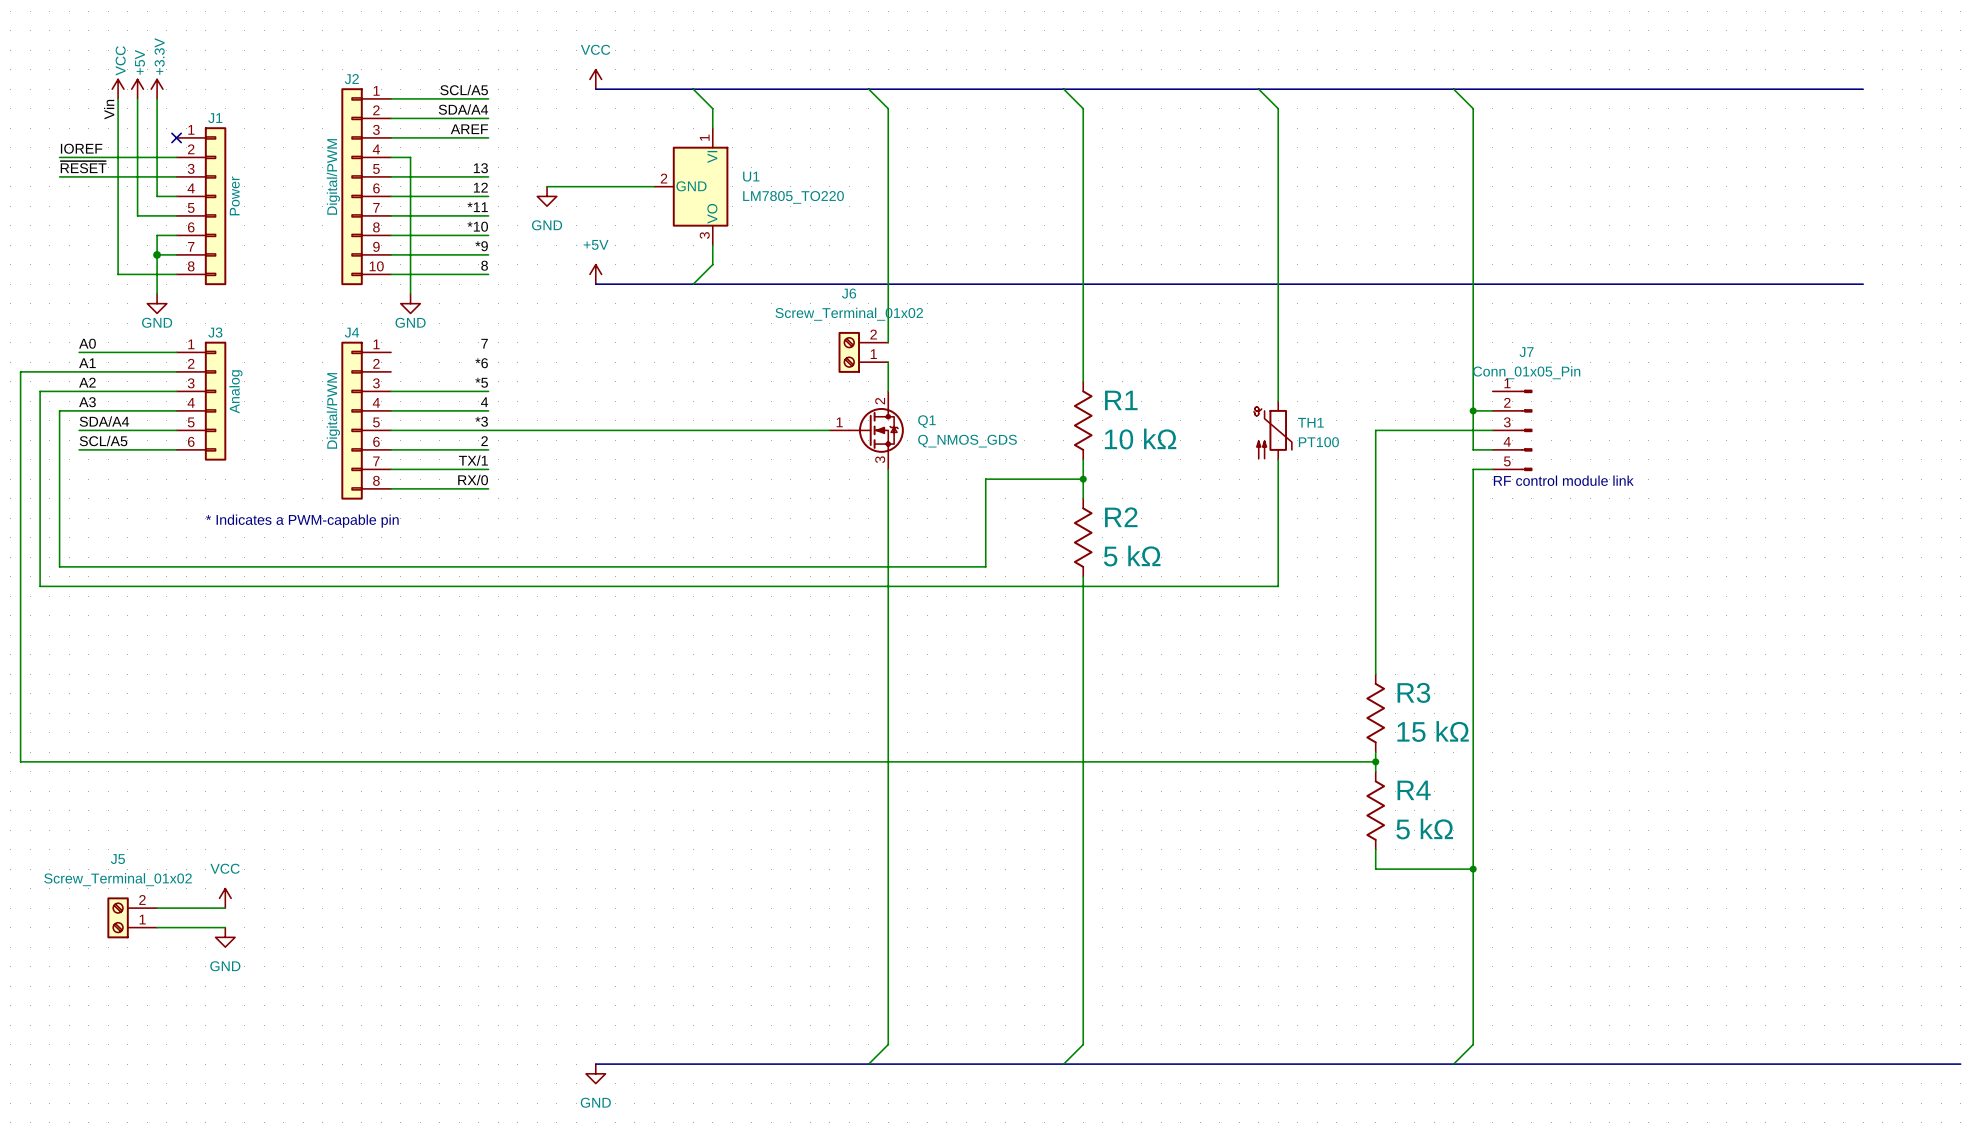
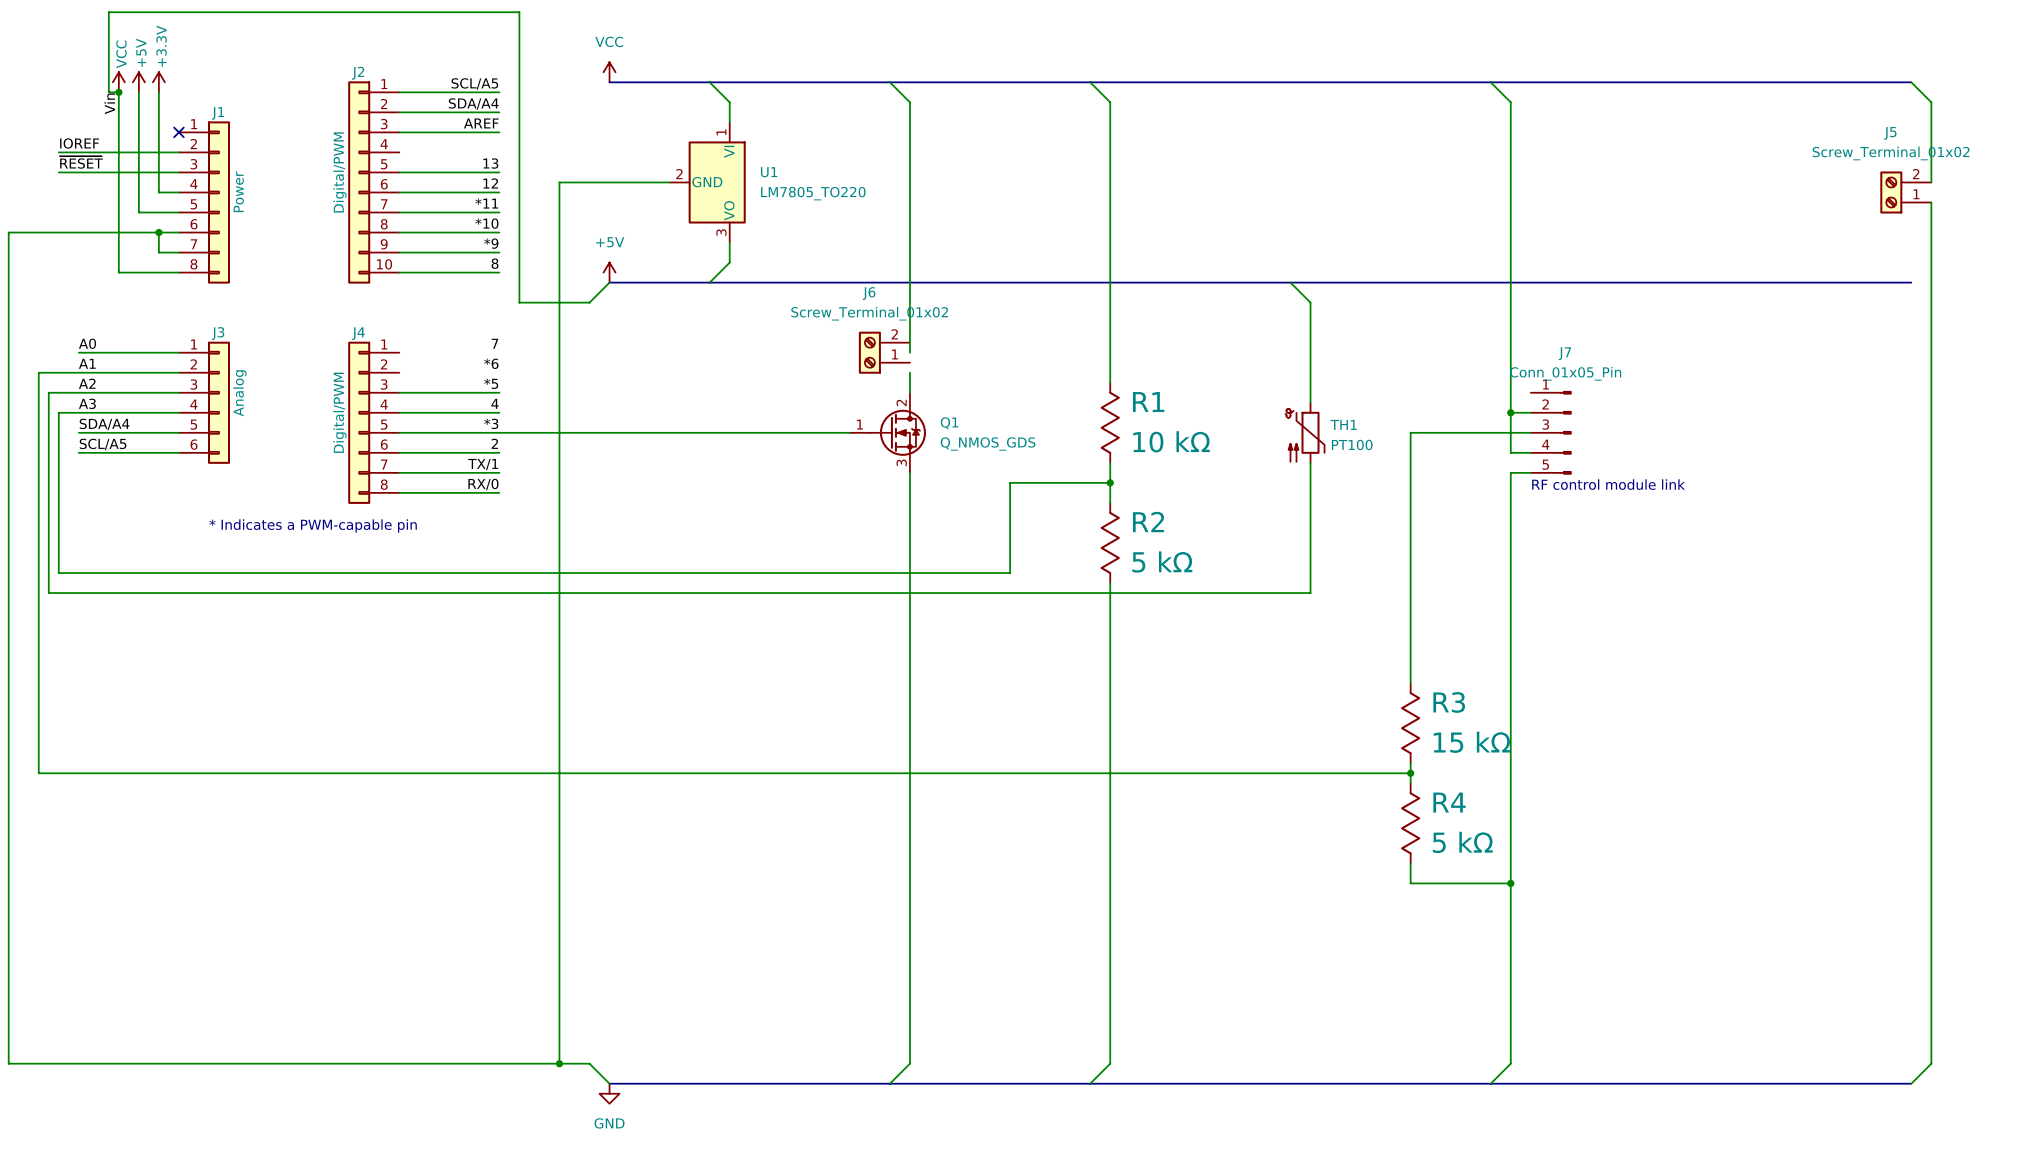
wire: (1258, 89) (1278, 108) (1278, 303) -> (1290, 282) (1310, 302)
wire: none -> (1911, 82) (1931, 102) (1931, 182)
wire: none -> (118, 92) (108, 92) (108, 12) (519, 12) (519, 302) (589, 302) (609, 282)
junction: none -> (118, 92)
wire: (391, 157) (410, 157) (410, 293) -> none
wire: none -> (559, 182) (559, 1063)
power symbol: GND (547, 196) -> none
wire: none -> (1931, 202) (1931, 1063) (1911, 1083)
wire: none -> (158, 232) (8, 232) (8, 1063) (589, 1063) (609, 1083)
junction: none -> (158, 232)
wire: (157, 254) (157, 293) -> none
junction: (157, 254) -> none
power symbol: GND (157, 303) -> none
power symbol: GND (410, 303) -> none
wire: (888, 362) (888, 371) -> (909, 342) (909, 352)
wire: (40, 371) (20, 371) (20, 761) (40, 761) -> none
wire: (40, 391) (49, 391) -> (38, 392) (38, 372)
wire: none -> (48, 392) (48, 593)
wire: (40, 586) (49, 586) -> (38, 593) (38, 773)
power symbol: VCC (225, 898) -> none
wire: (157, 908) (225, 908) -> none
J5 position: (132, 917) -> (1905, 192)
wire: (157, 927) (225, 927) -> none
power symbol: GND (225, 937) -> none
junction: none -> (559, 1063)
bus: (1863, 1064) (1960, 1064) -> none

